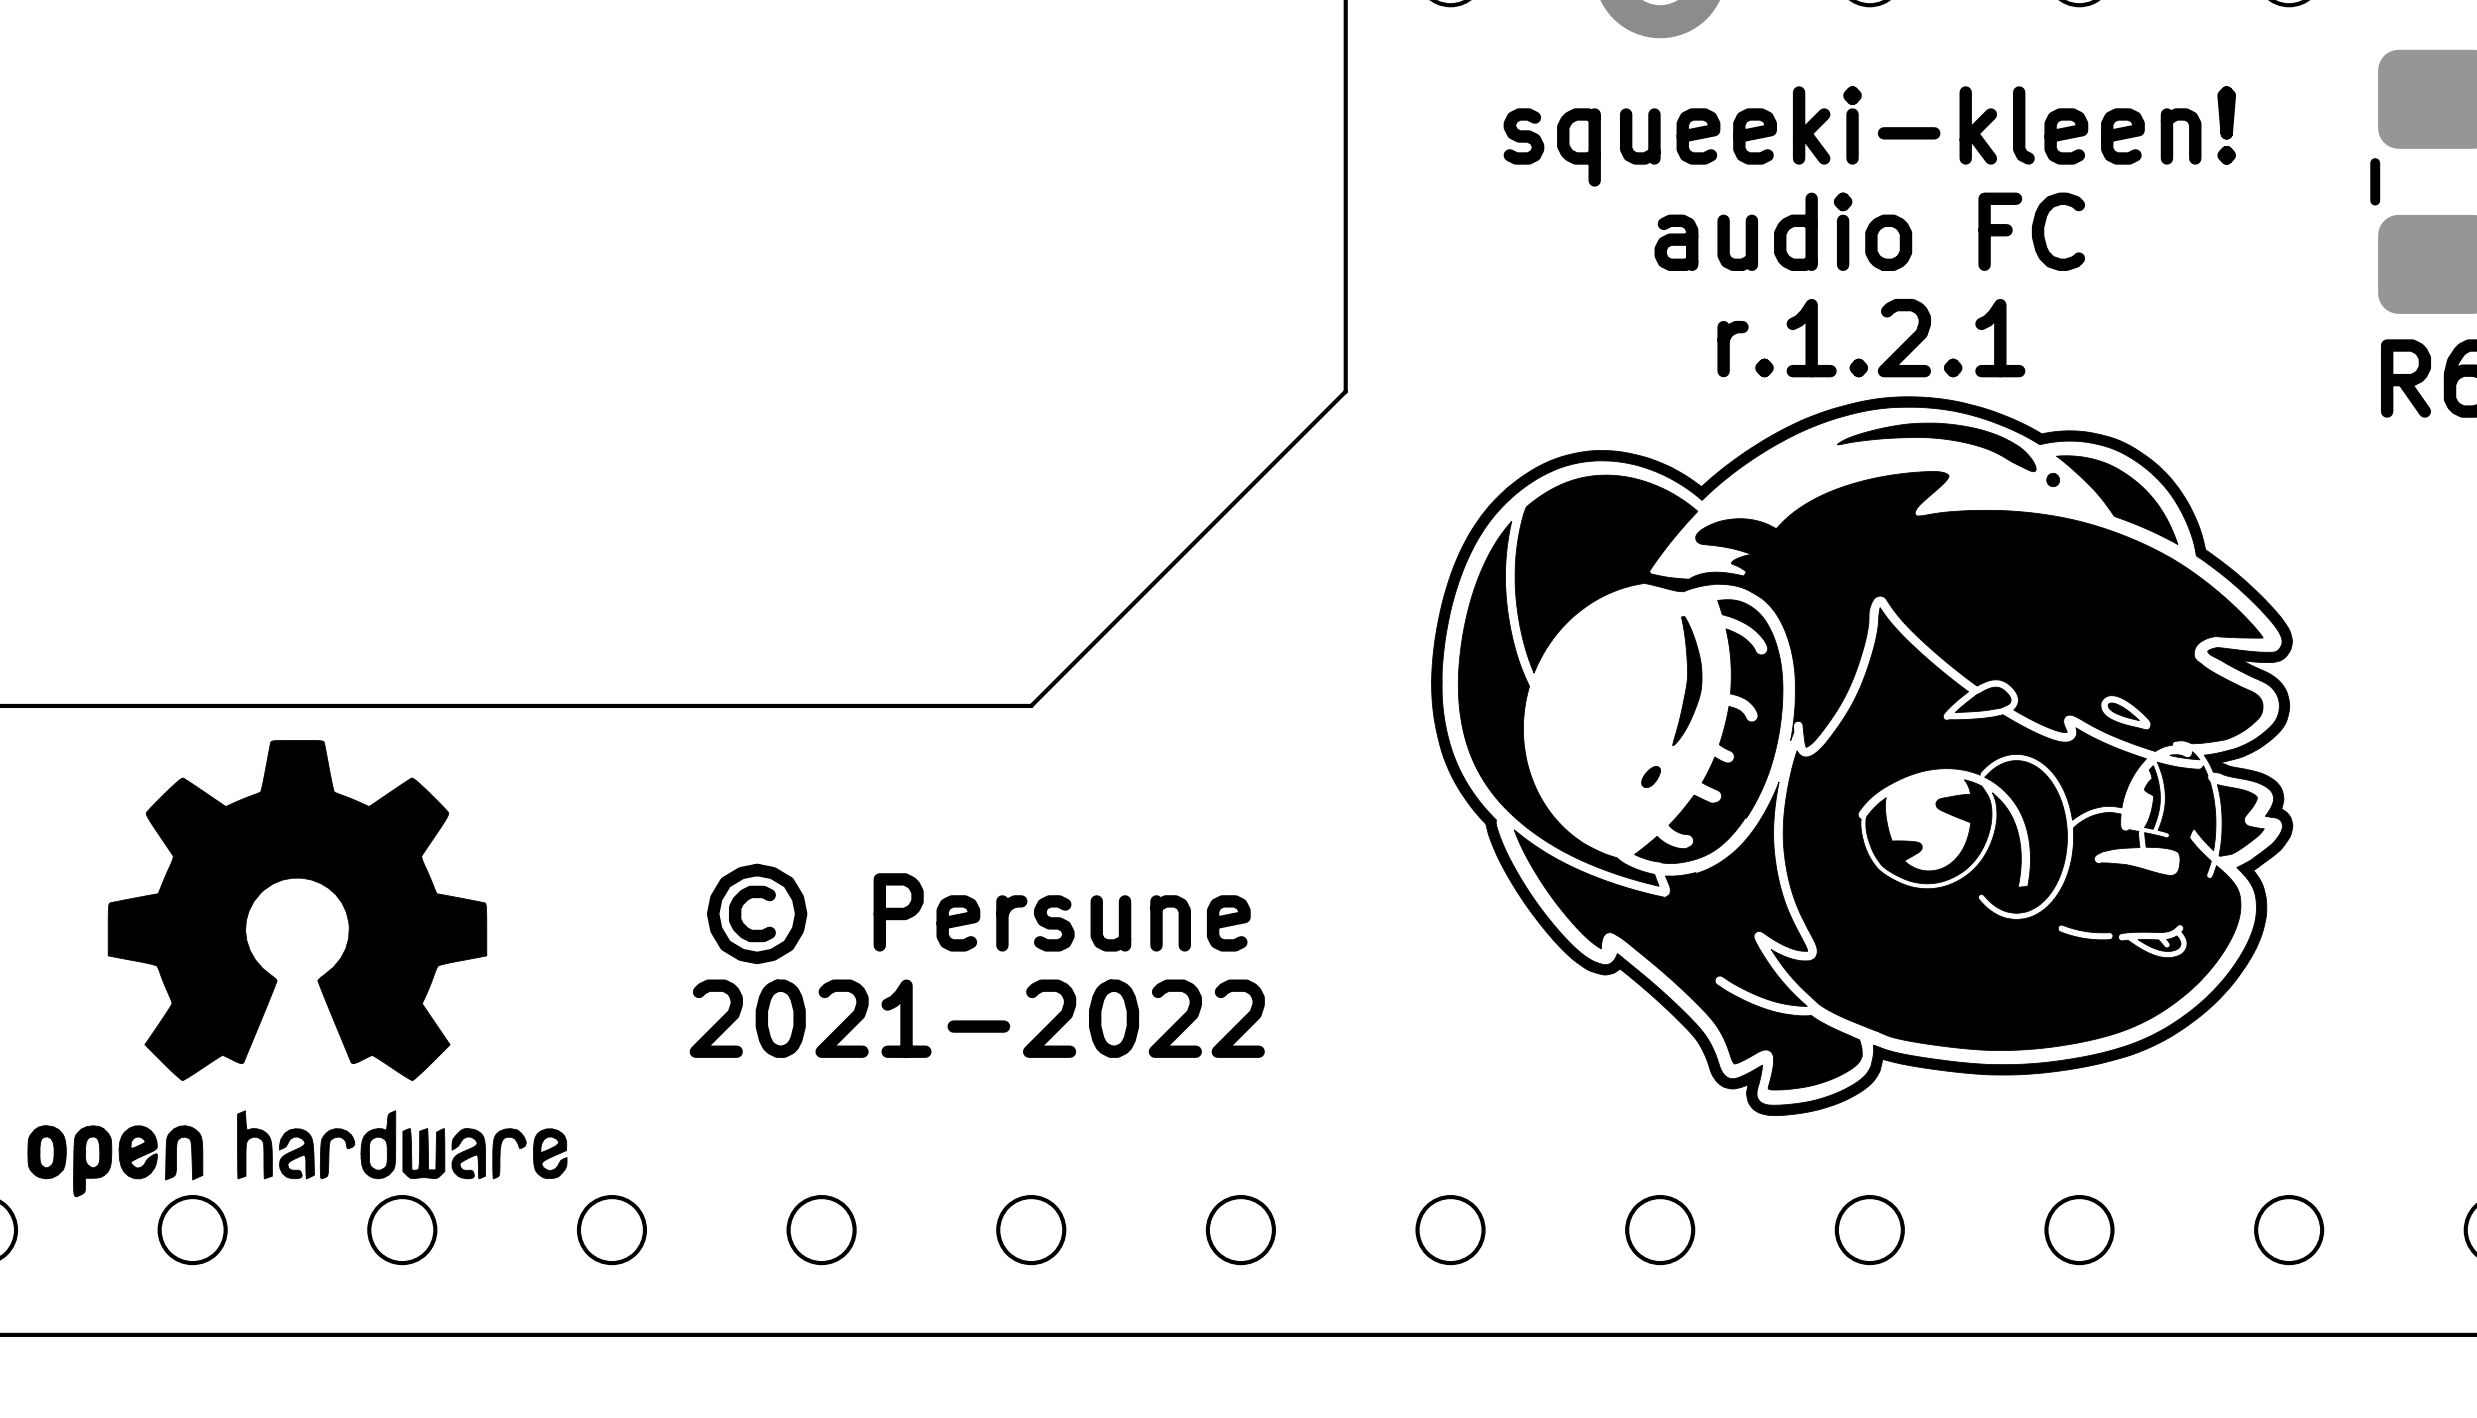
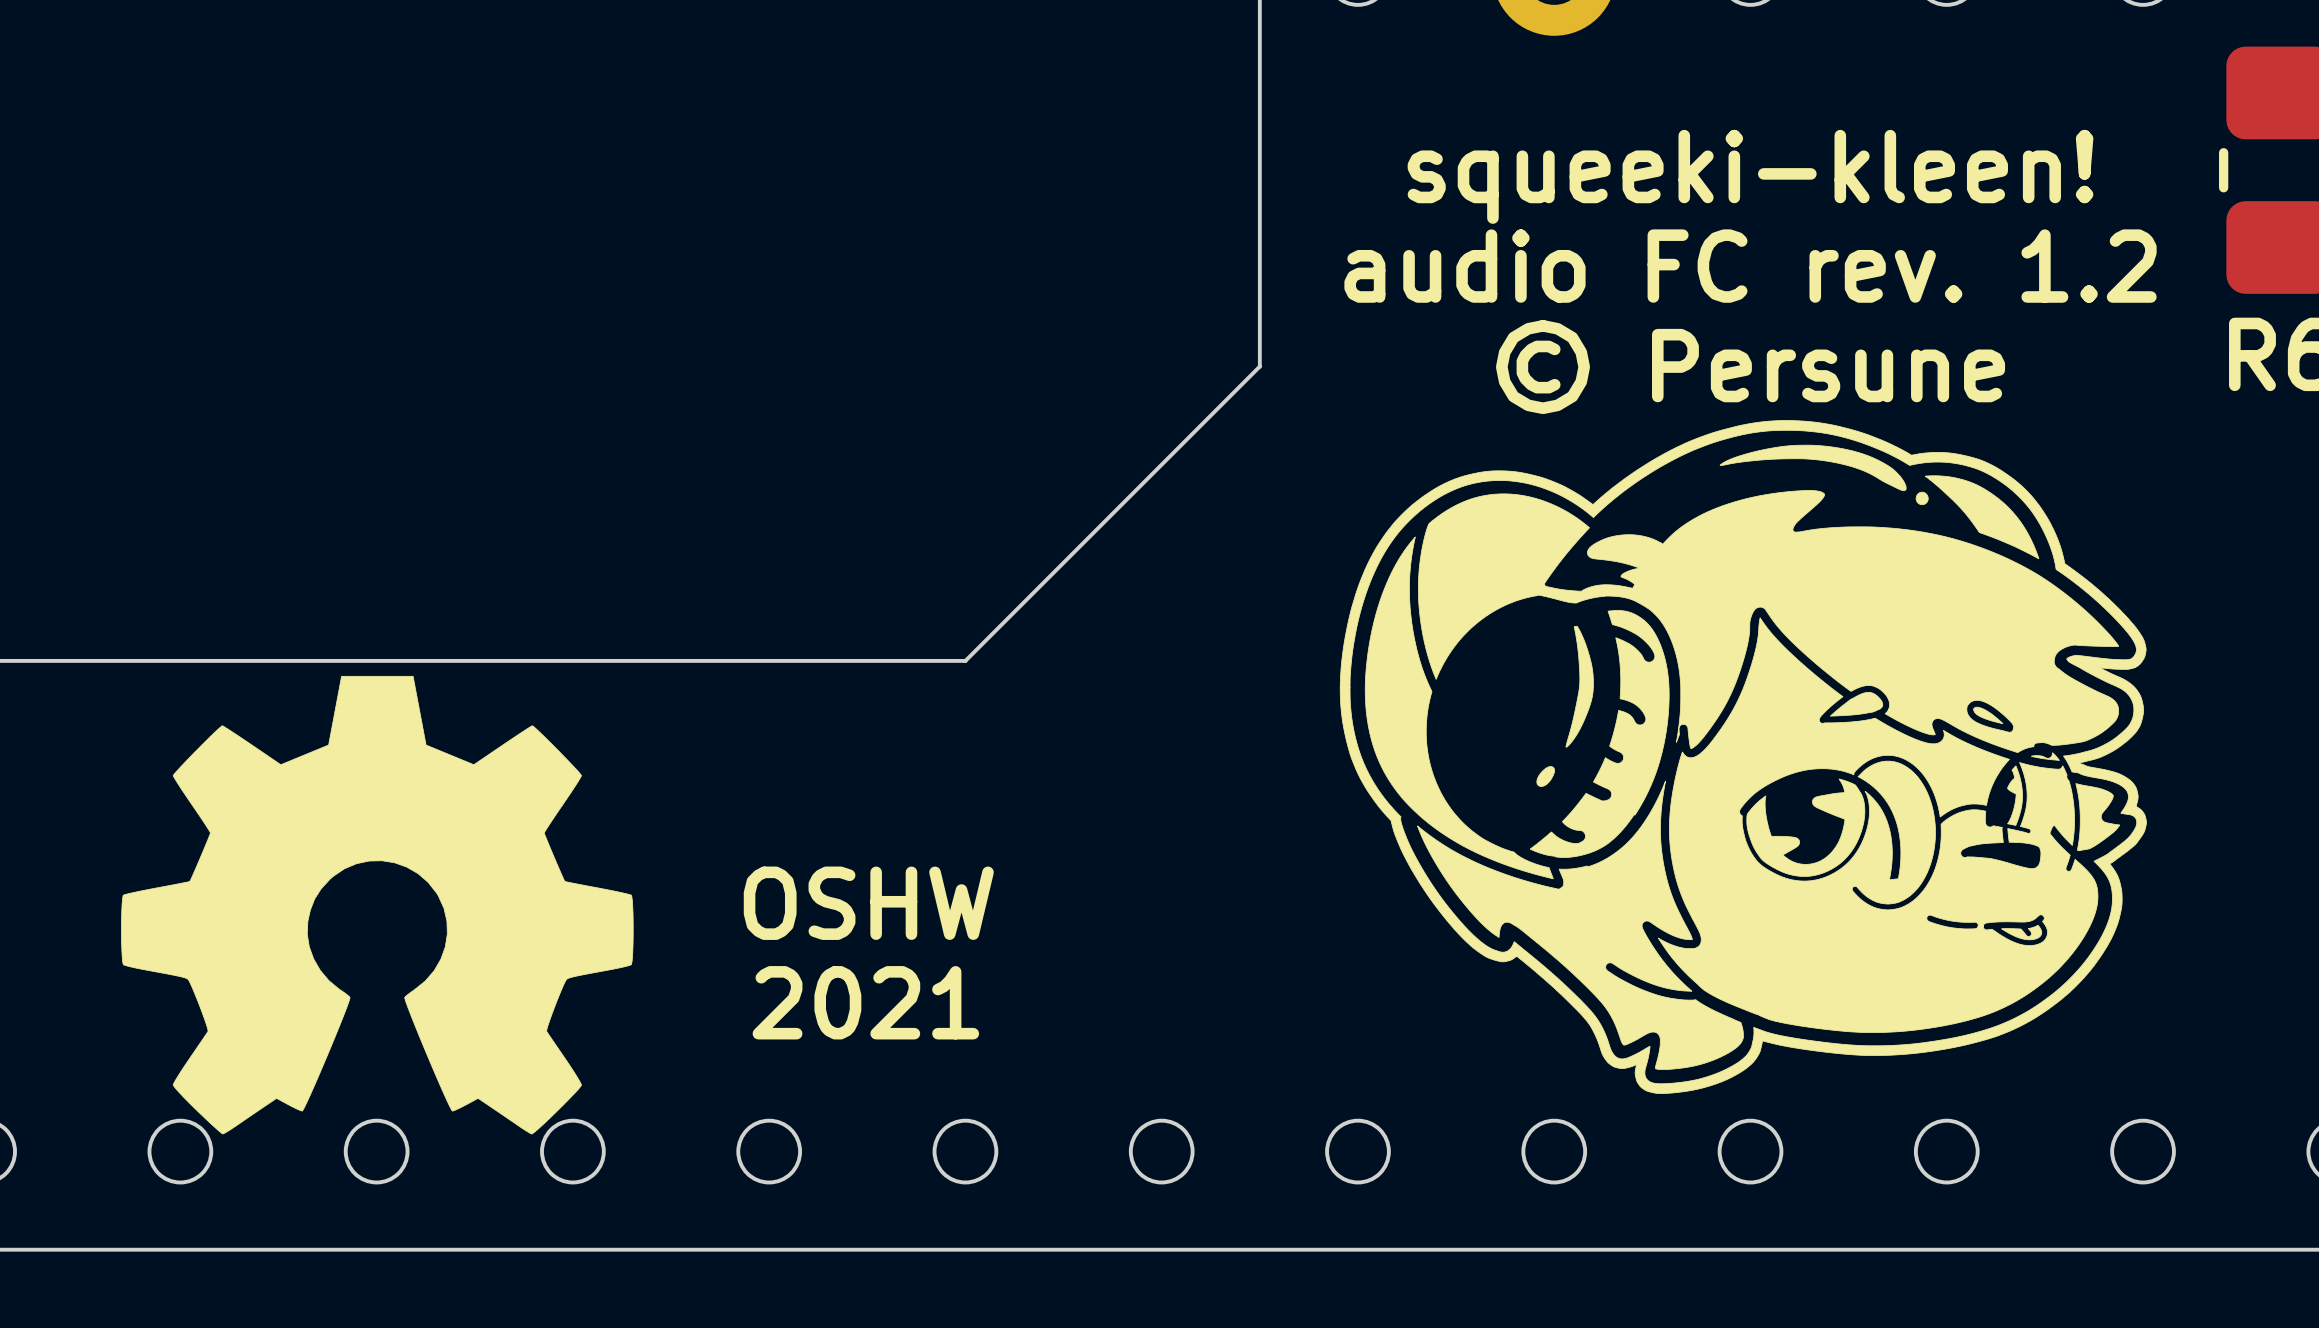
text position: squeeki-kleen! (1869, 136) -> squeeki-kleen! (1750, 176)
text: audio FC (1869, 231) -> audio FC rev. 1.2 (1750, 266)
text: r.1.2.1 (1871, 338) -> none
drawing: none -> [121, 675, 634, 1135]
drawing: [27, 739, 568, 1198] -> none
drawing position: (1862, 756) -> (1743, 757)
text position: © Persune (978, 913) -> © Persune (1750, 367)
text: none -> OSHW (868, 903)
text: 2021-2022 (977, 1018) -> 2021 (865, 1002)

